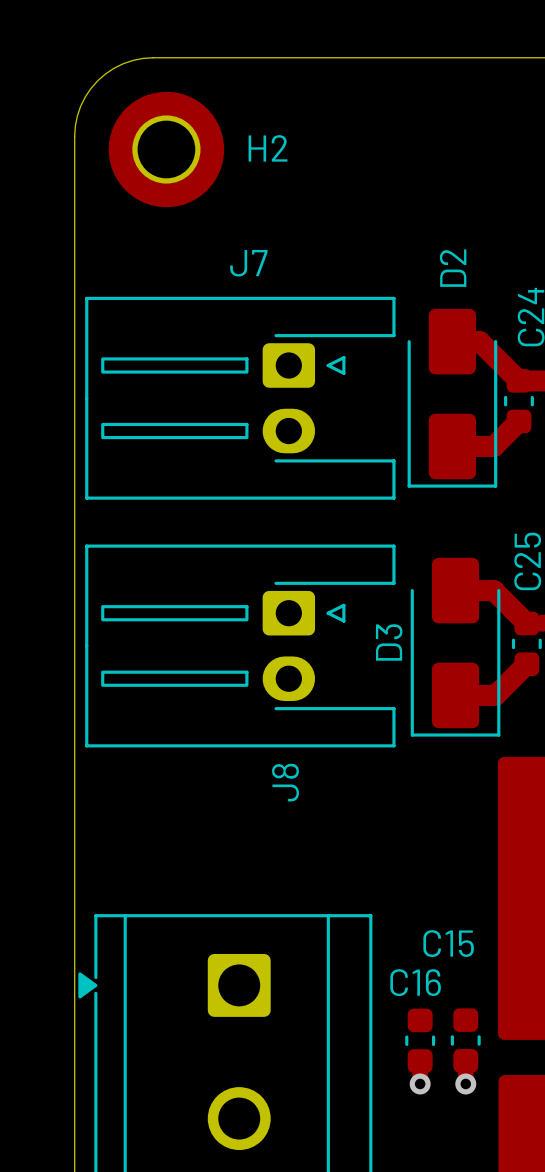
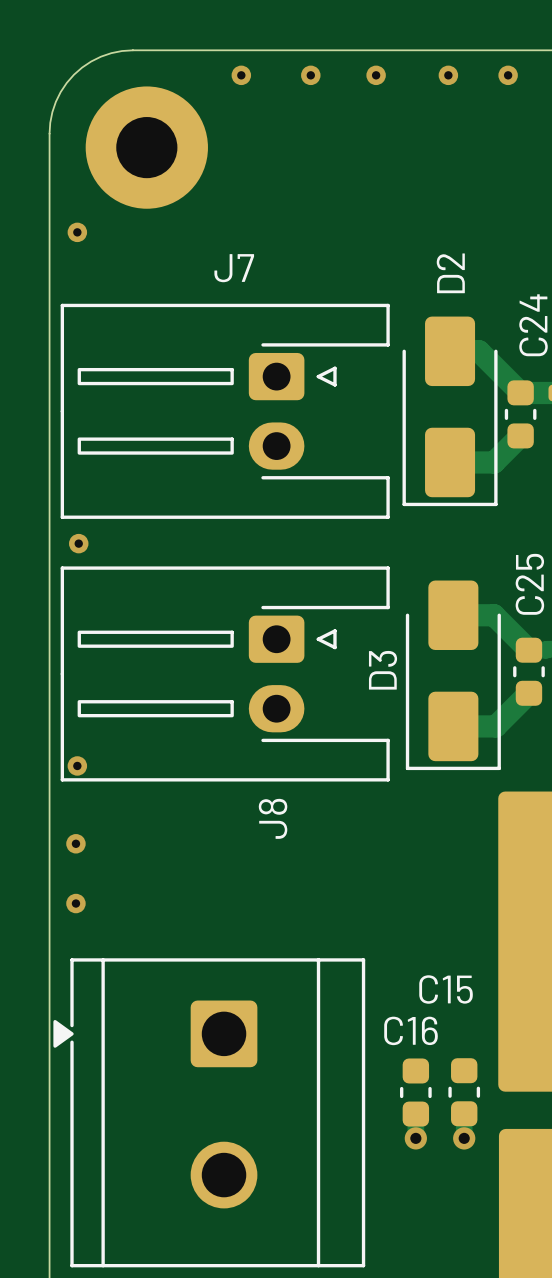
via: none -> (241, 75)
via: none -> (310, 75)
via: none -> (376, 75)
via: none -> (448, 75)
via: none -> (508, 75)
H2 name: H2 (268, 148) -> none
via: none -> (77, 232)
via: none -> (78, 543)
via: none -> (77, 765)
via: none -> (75, 843)
via: none -> (75, 903)

